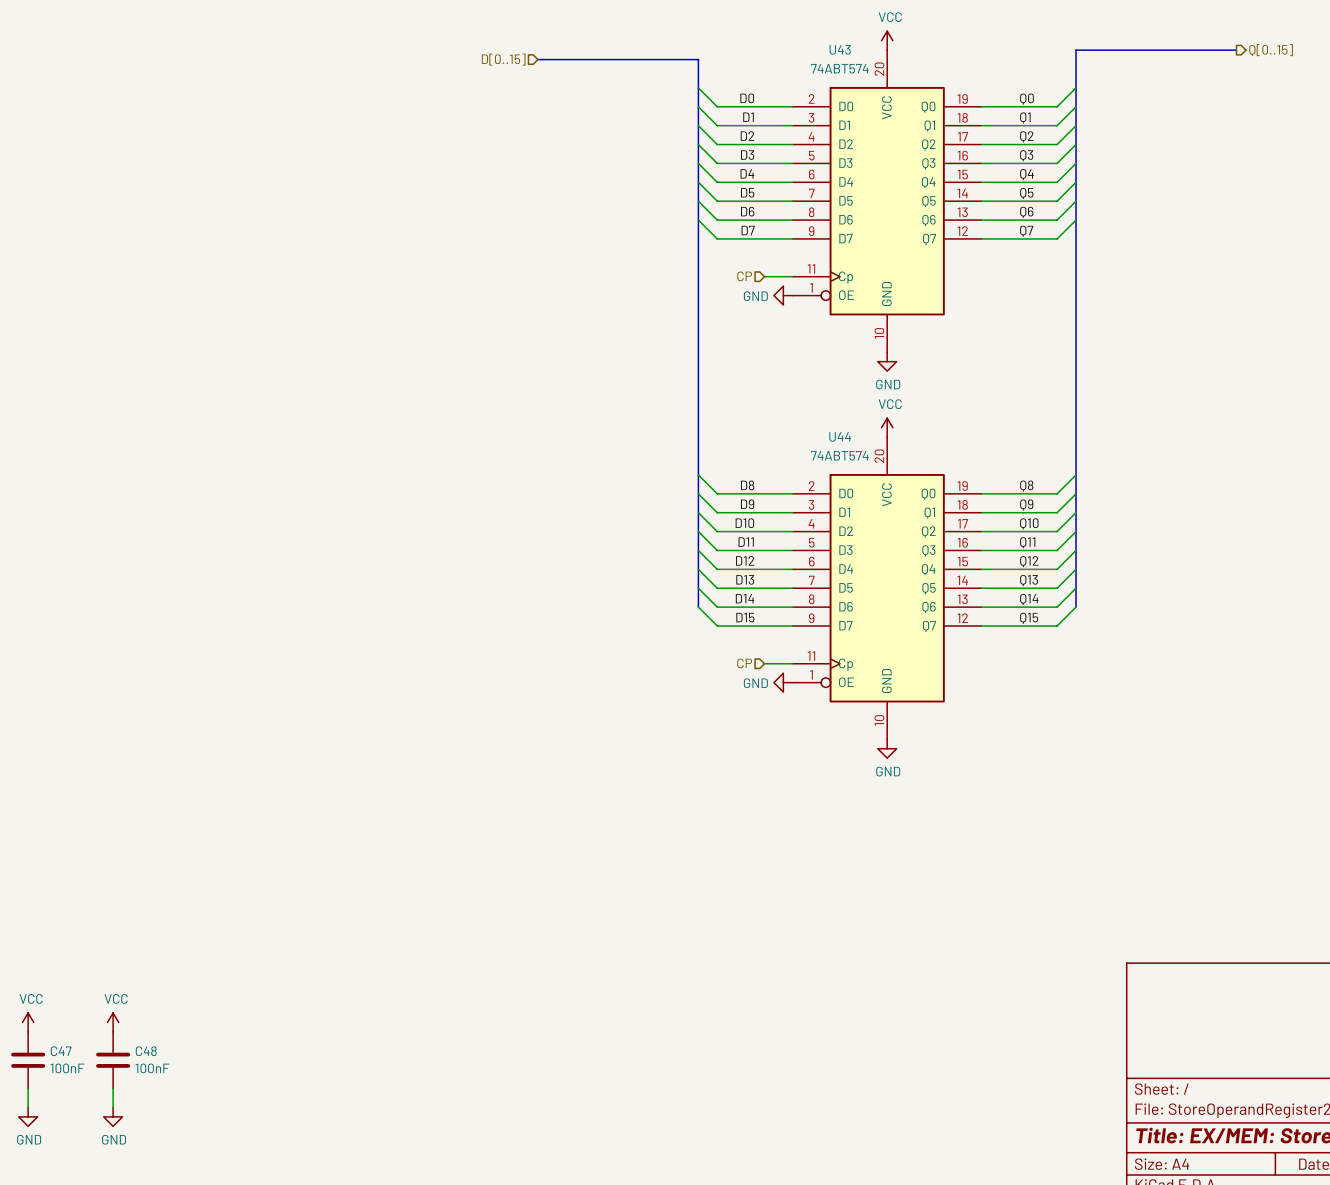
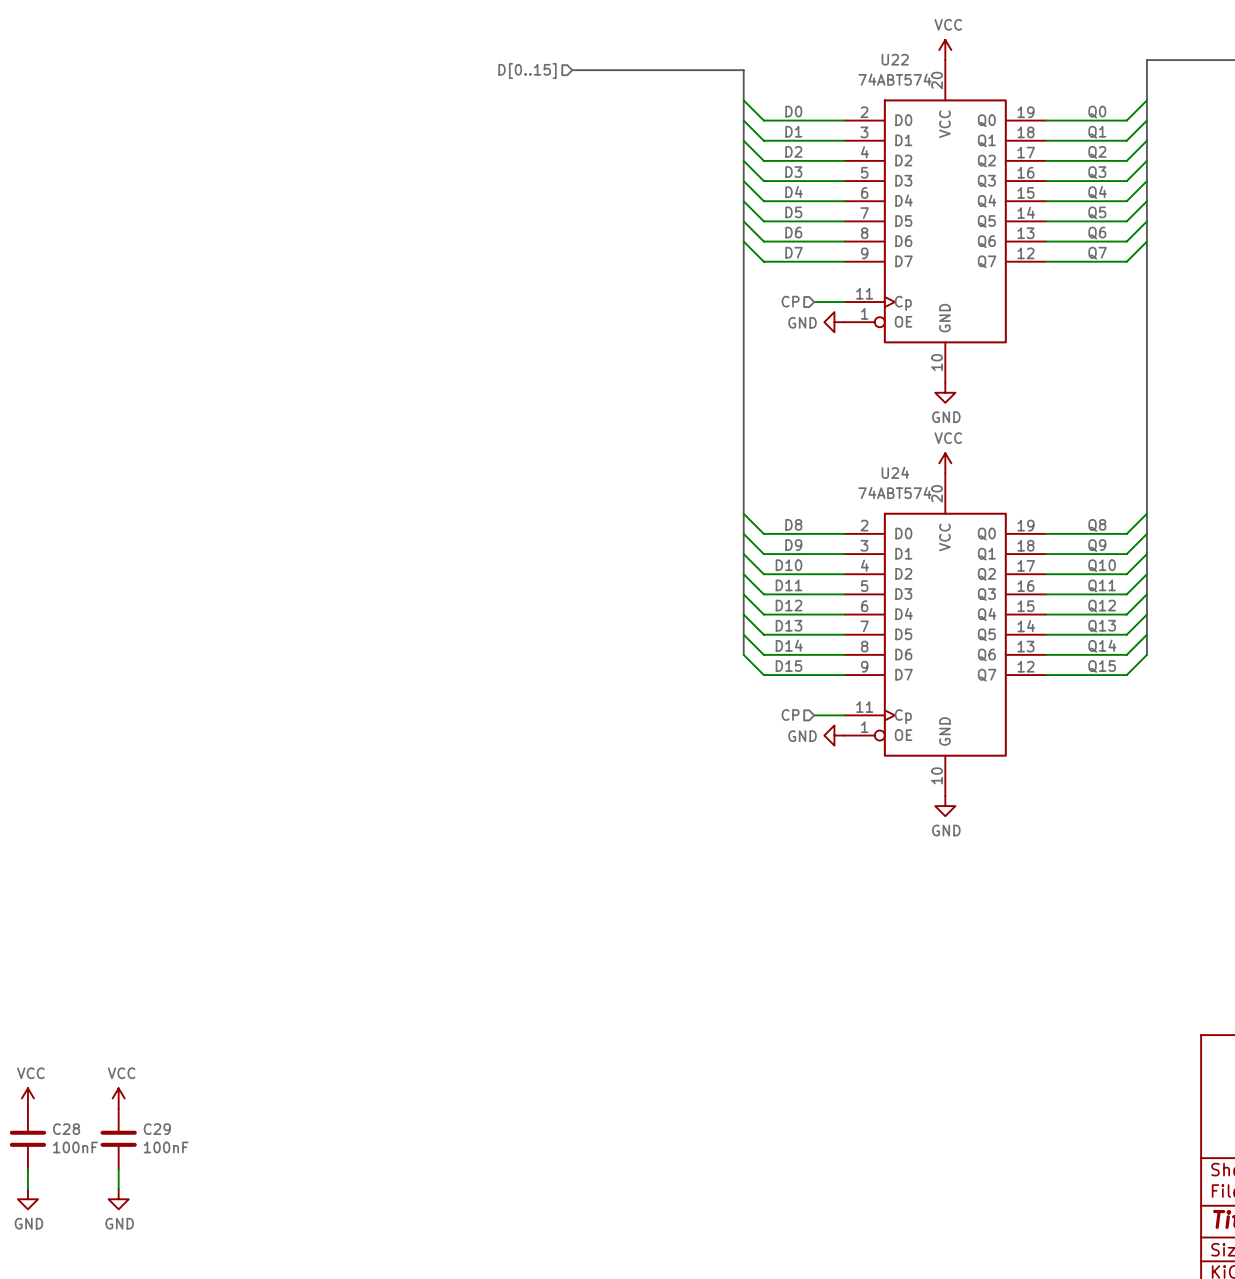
U43 name: U43 (840, 49) -> U22 (895, 59)
U44 name: U44 (840, 436) -> U24 (895, 472)
C47 name: C47 (61, 1051) -> C28 (66, 1129)
C48 name: C48 (146, 1051) -> C29 (157, 1129)

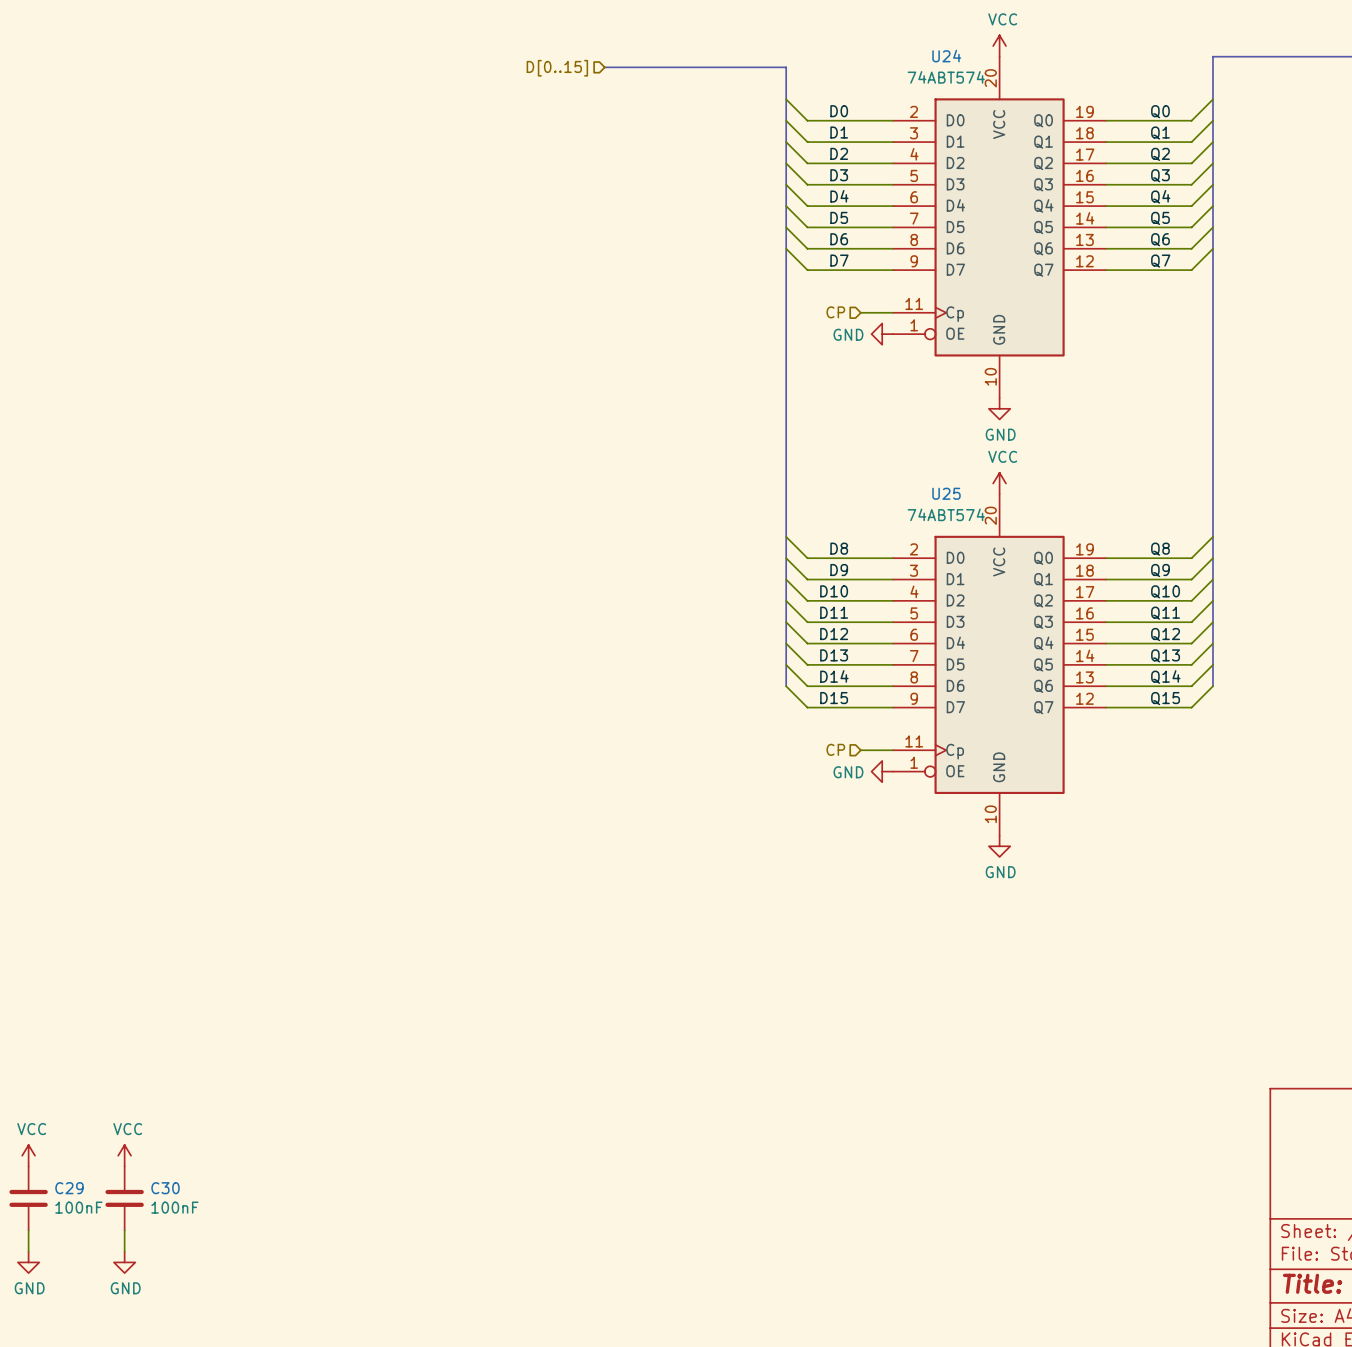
U22 name: U22 (895, 59) -> U24 (946, 56)
U24 name: U24 (895, 472) -> U25 (946, 493)
C28 name: C28 (66, 1129) -> C29 (69, 1188)
C29 name: C29 (157, 1129) -> C30 (165, 1188)

